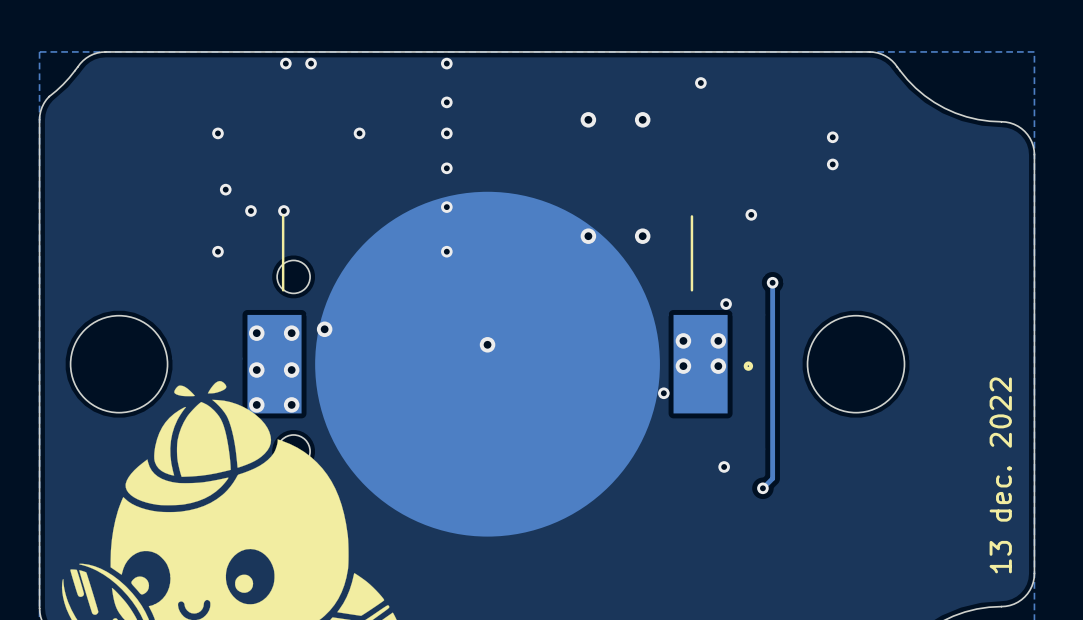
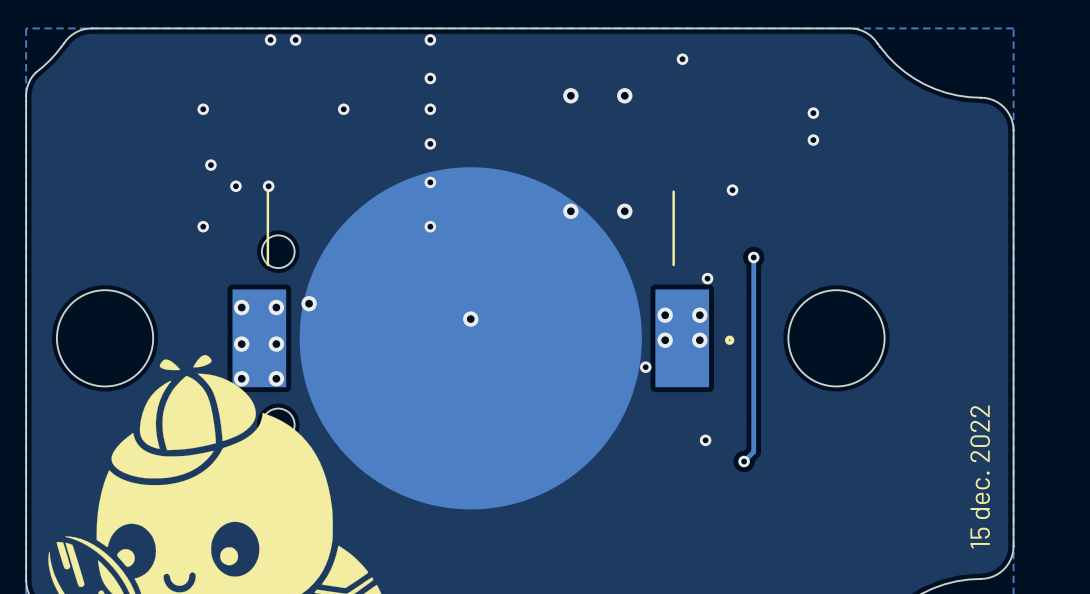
text: 13 dec. 2022 (1000, 475) -> 15 dec. 2022 (980, 477)

